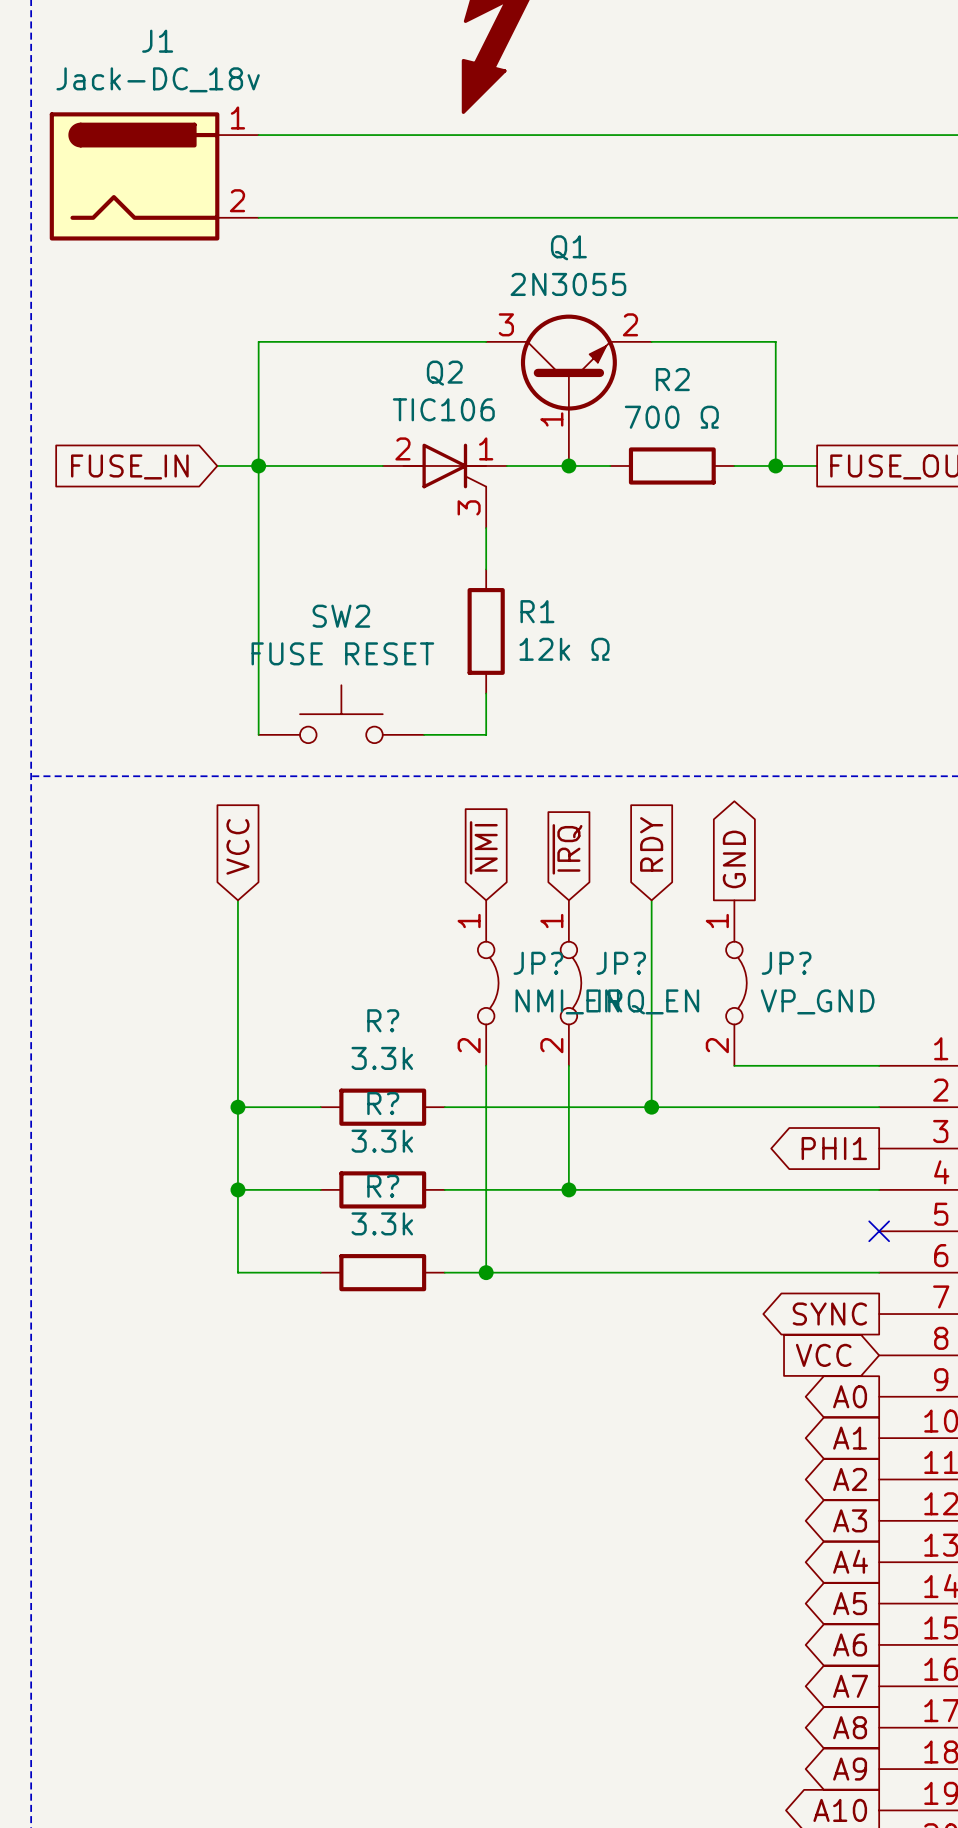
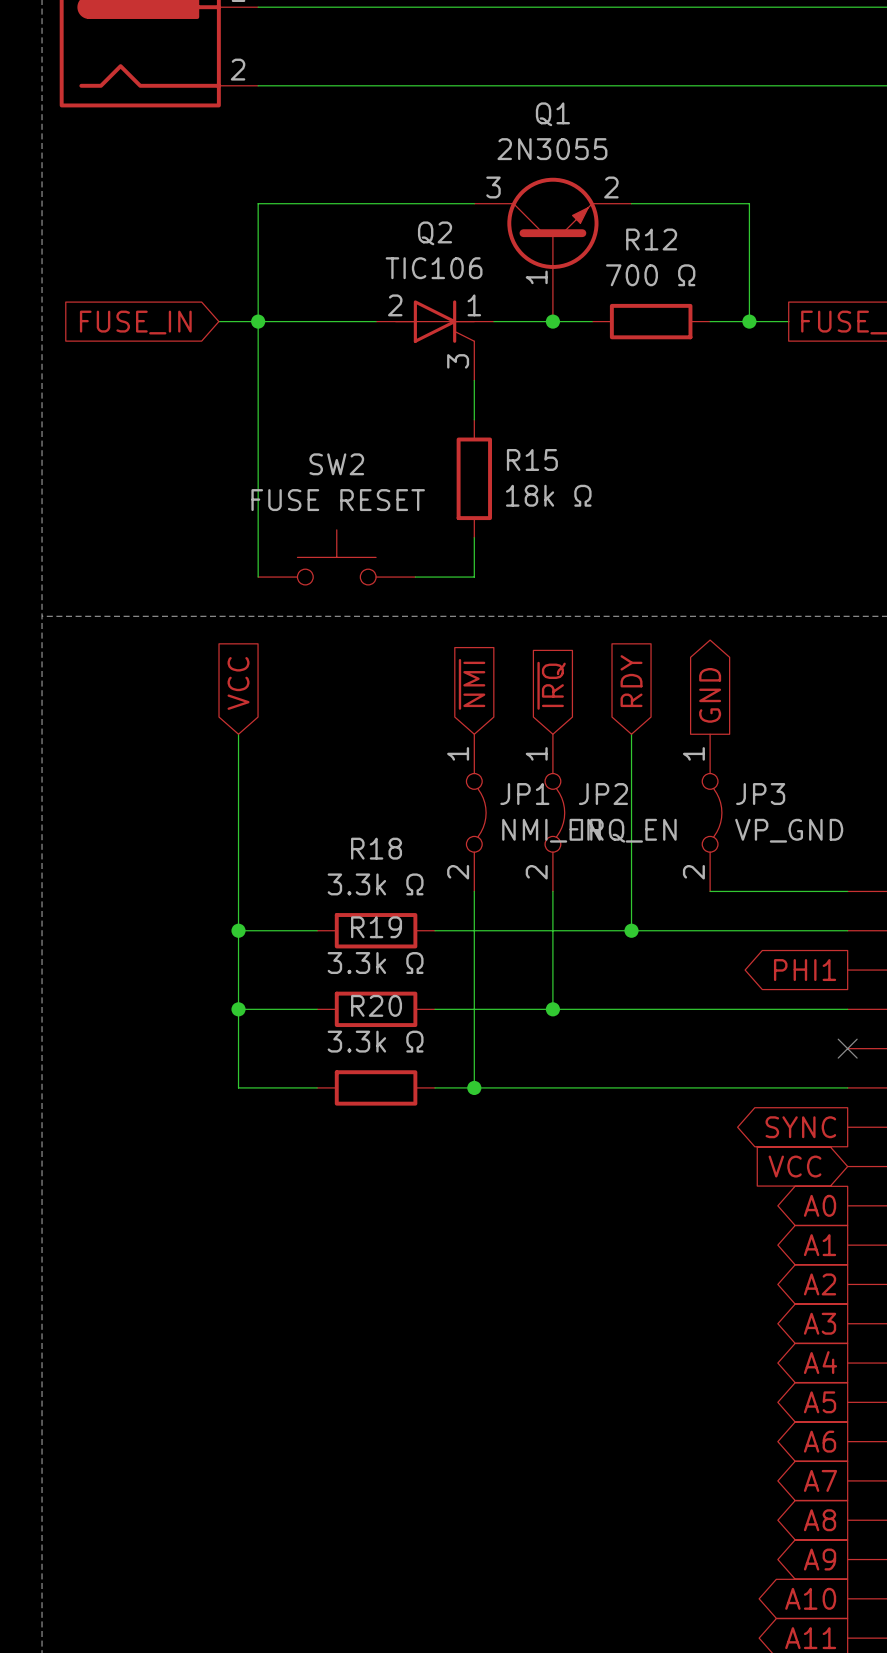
R2 name: R2 (672, 379) -> R12 (651, 239)
R1 name: R1 (537, 611) -> R15 (532, 459)
R1 value: 12k Ω (564, 649) -> 18k Ω (548, 495)
JP? name: JP? (538, 963) -> JP1 (524, 794)
JP? name: JP? (621, 963) -> JP2 (603, 794)
JP? name: JP? (786, 963) -> JP3 (760, 794)
R? name: R? (383, 1020) -> R18 (376, 848)
R? value: 3.3k (382, 1058) -> 3.3k Ω (375, 884)
R? name: R? (383, 1103) -> R19 (376, 927)
R? value: 3.3k (382, 1141) -> 3.3k Ω (375, 963)
R? name: R? (383, 1186) -> R20 (376, 1005)
R? value: 3.3k (382, 1223) -> 3.3k Ω (375, 1041)

